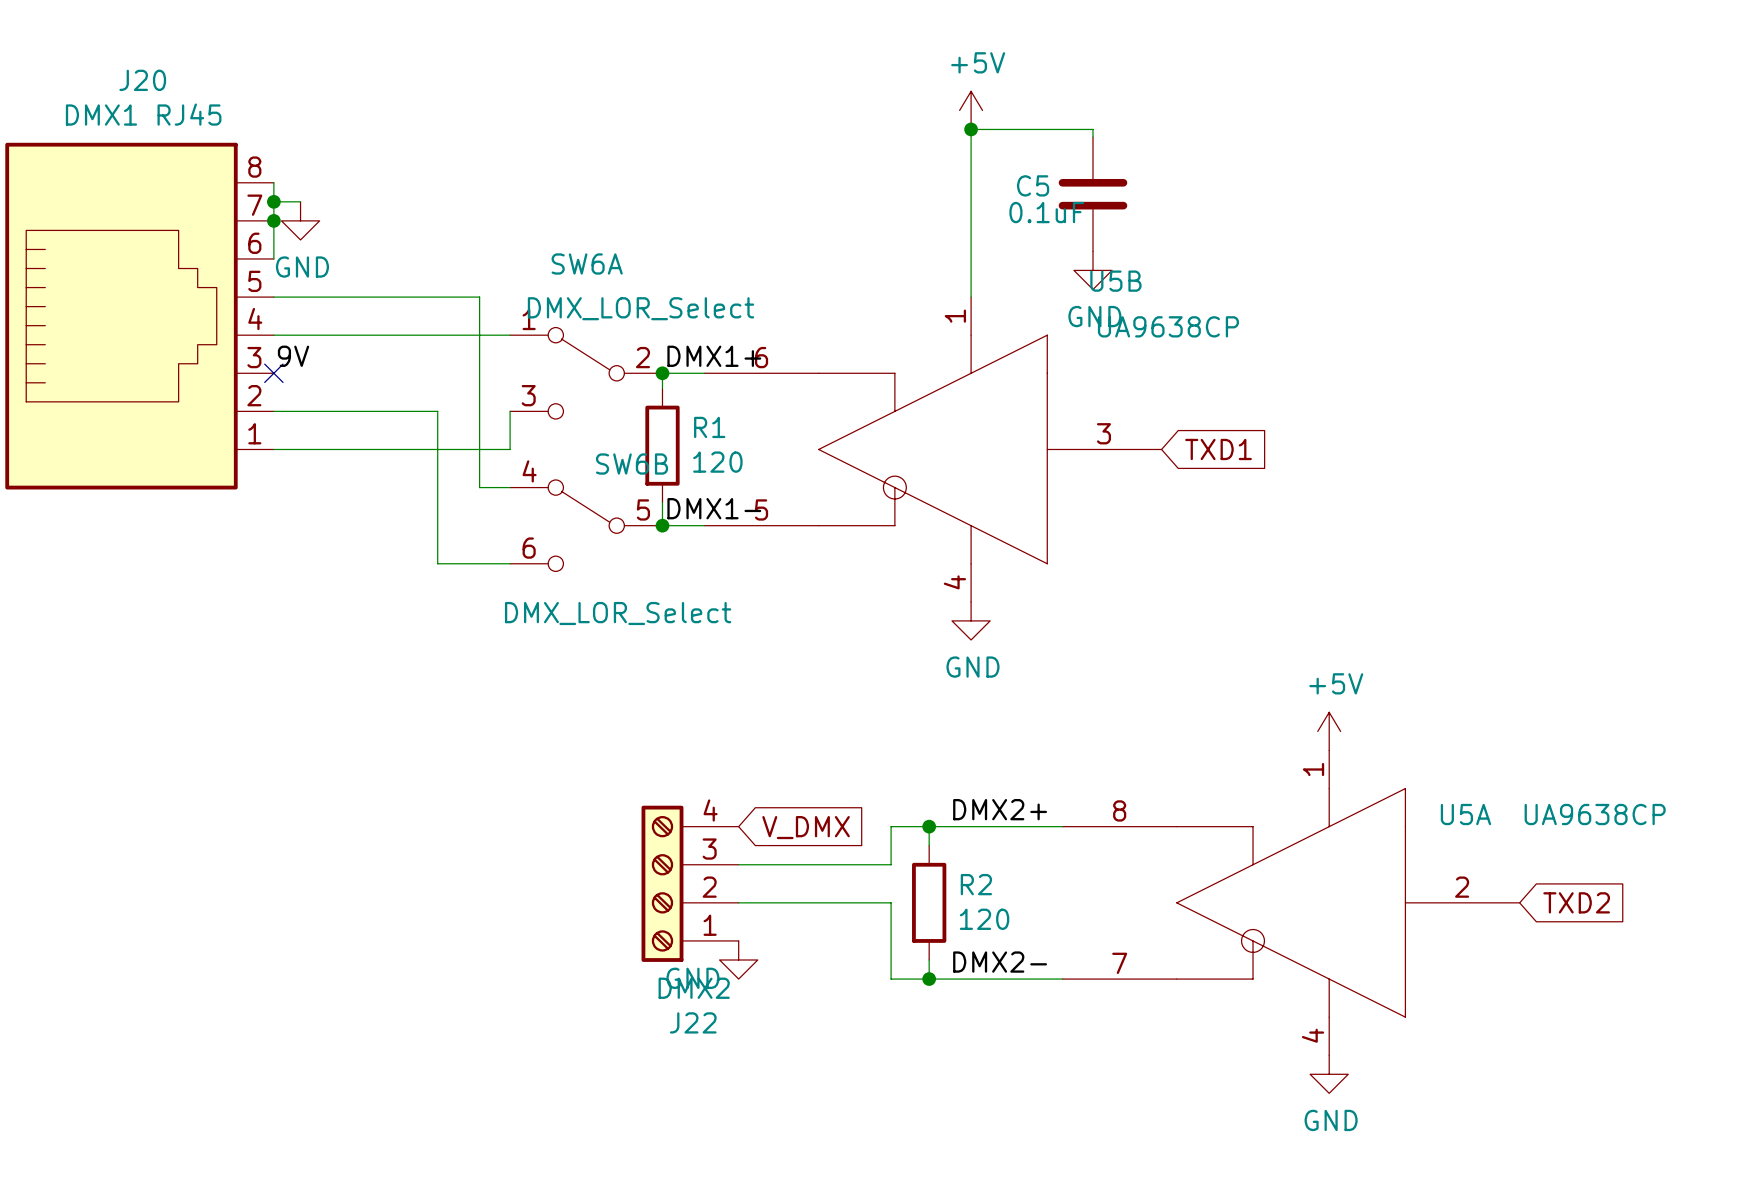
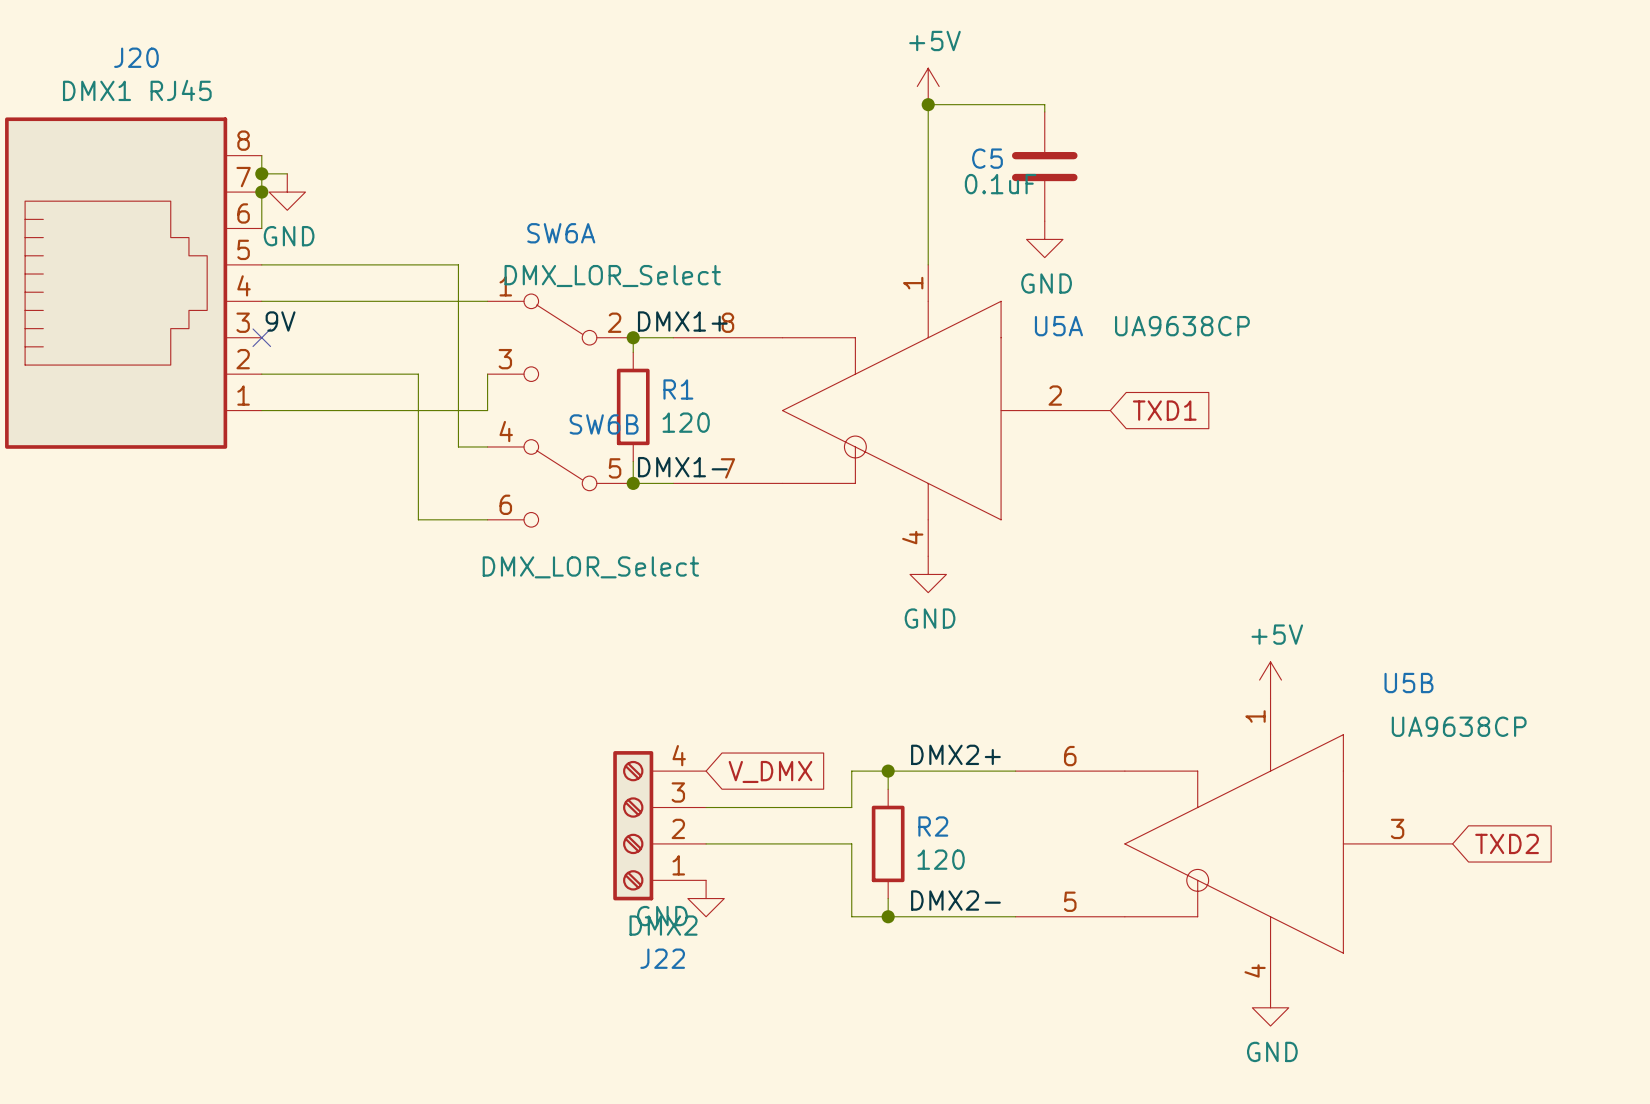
U5B position: (932, 449) -> (1234, 843)
U5A position: (1291, 902) -> (891, 410)

